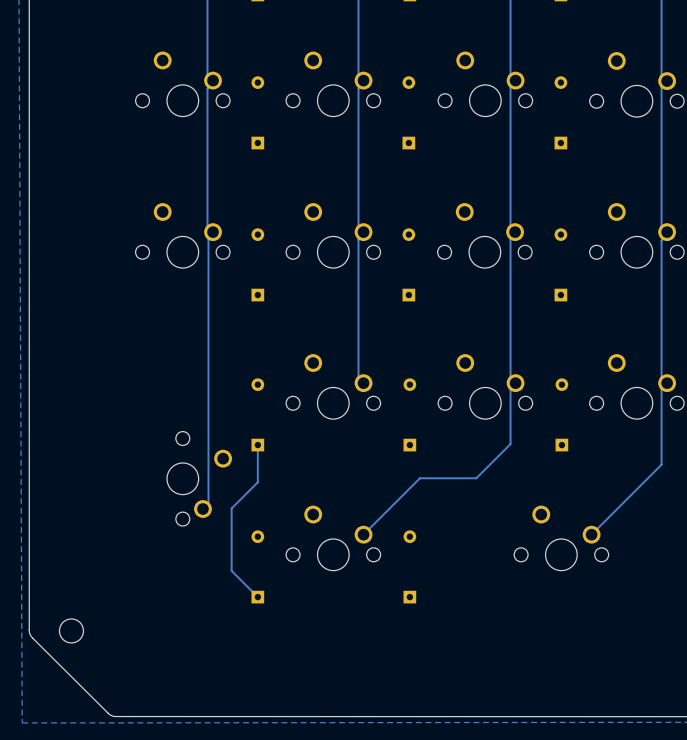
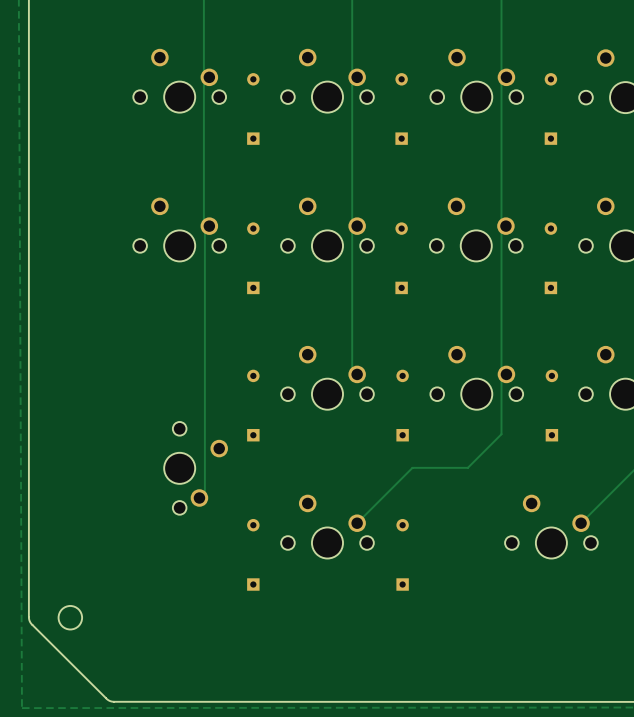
track: (257, 445) (257, 482) (231, 508) (231, 570) (257, 597) -> none

